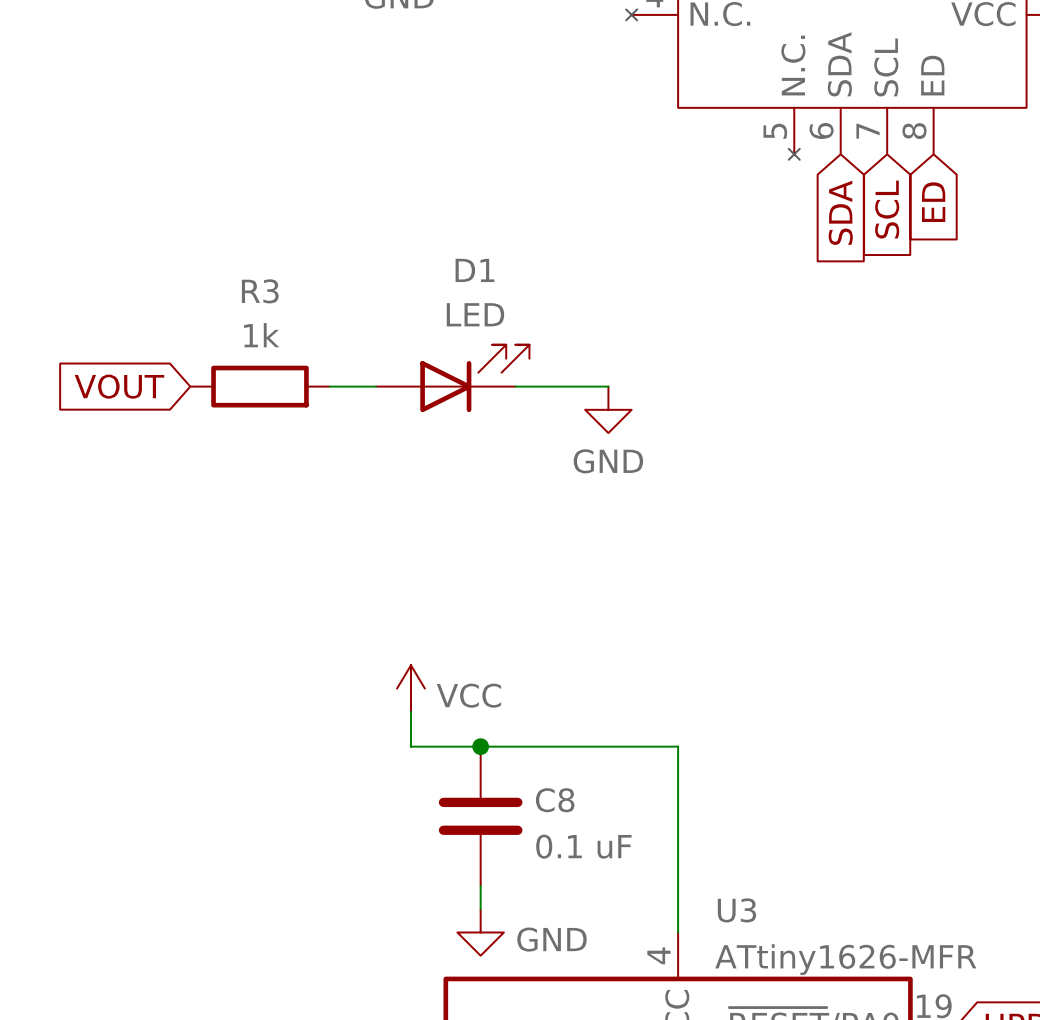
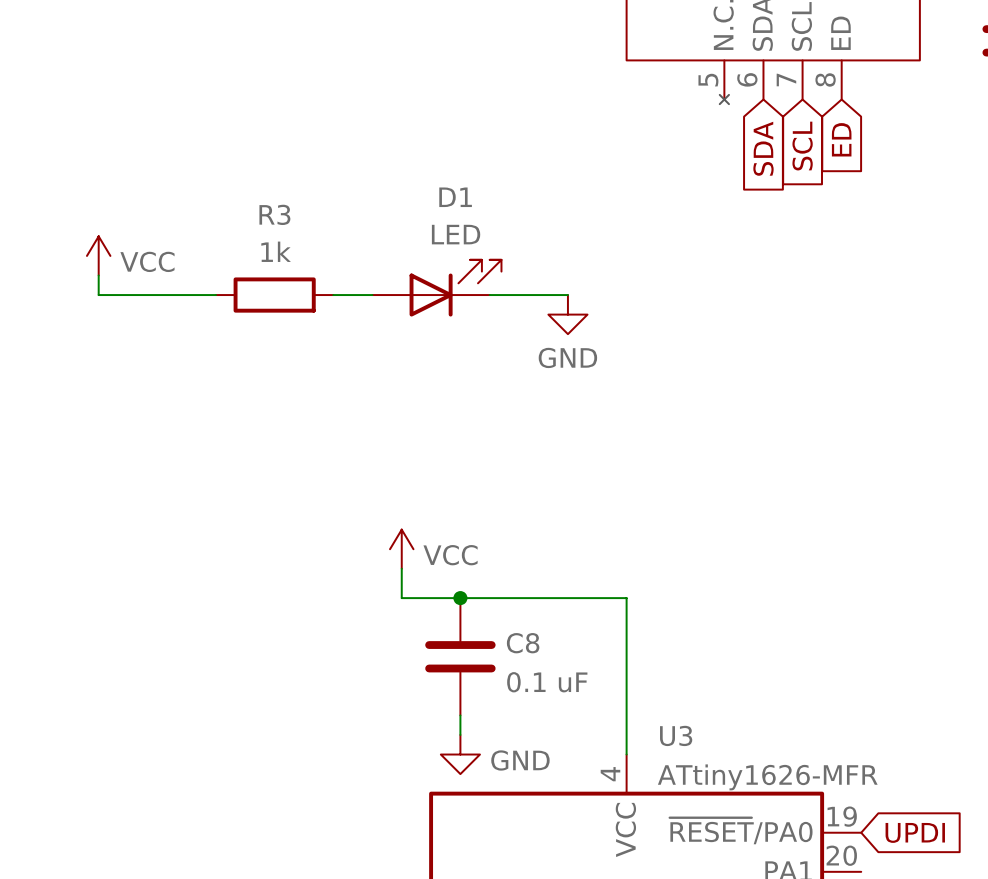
power symbol: none -> VCC (98, 255)
wire: none -> (98, 275) (98, 295) (216, 295)
global label: VOUT (119, 386) -> none

